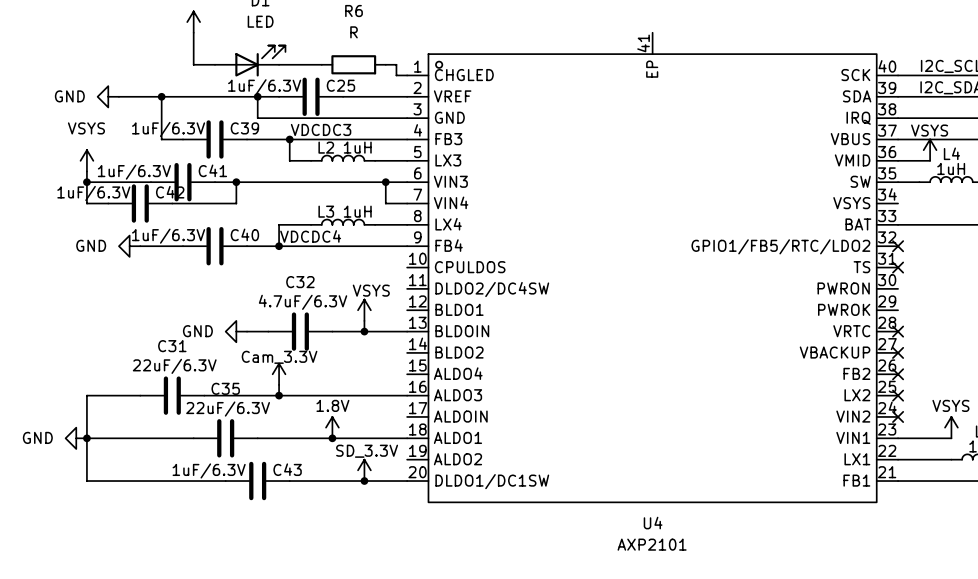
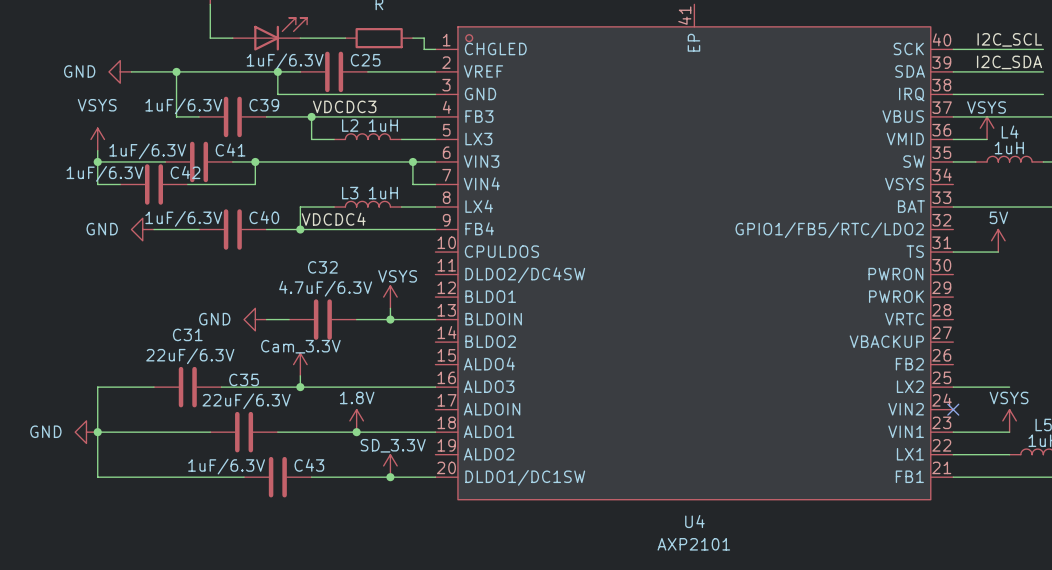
no-connect mark: (898, 246) -> none
power symbol: none -> 5V (998, 240)
wire: none -> (953, 252) (998, 252)
no-connect mark: (898, 267) -> none
no-connect mark: (898, 331) -> none
no-connect mark: (898, 352) -> none
no-connect mark: (898, 374) -> none
wire: none -> (953, 387) (1009, 387)
no-connect mark: (898, 395) -> none

